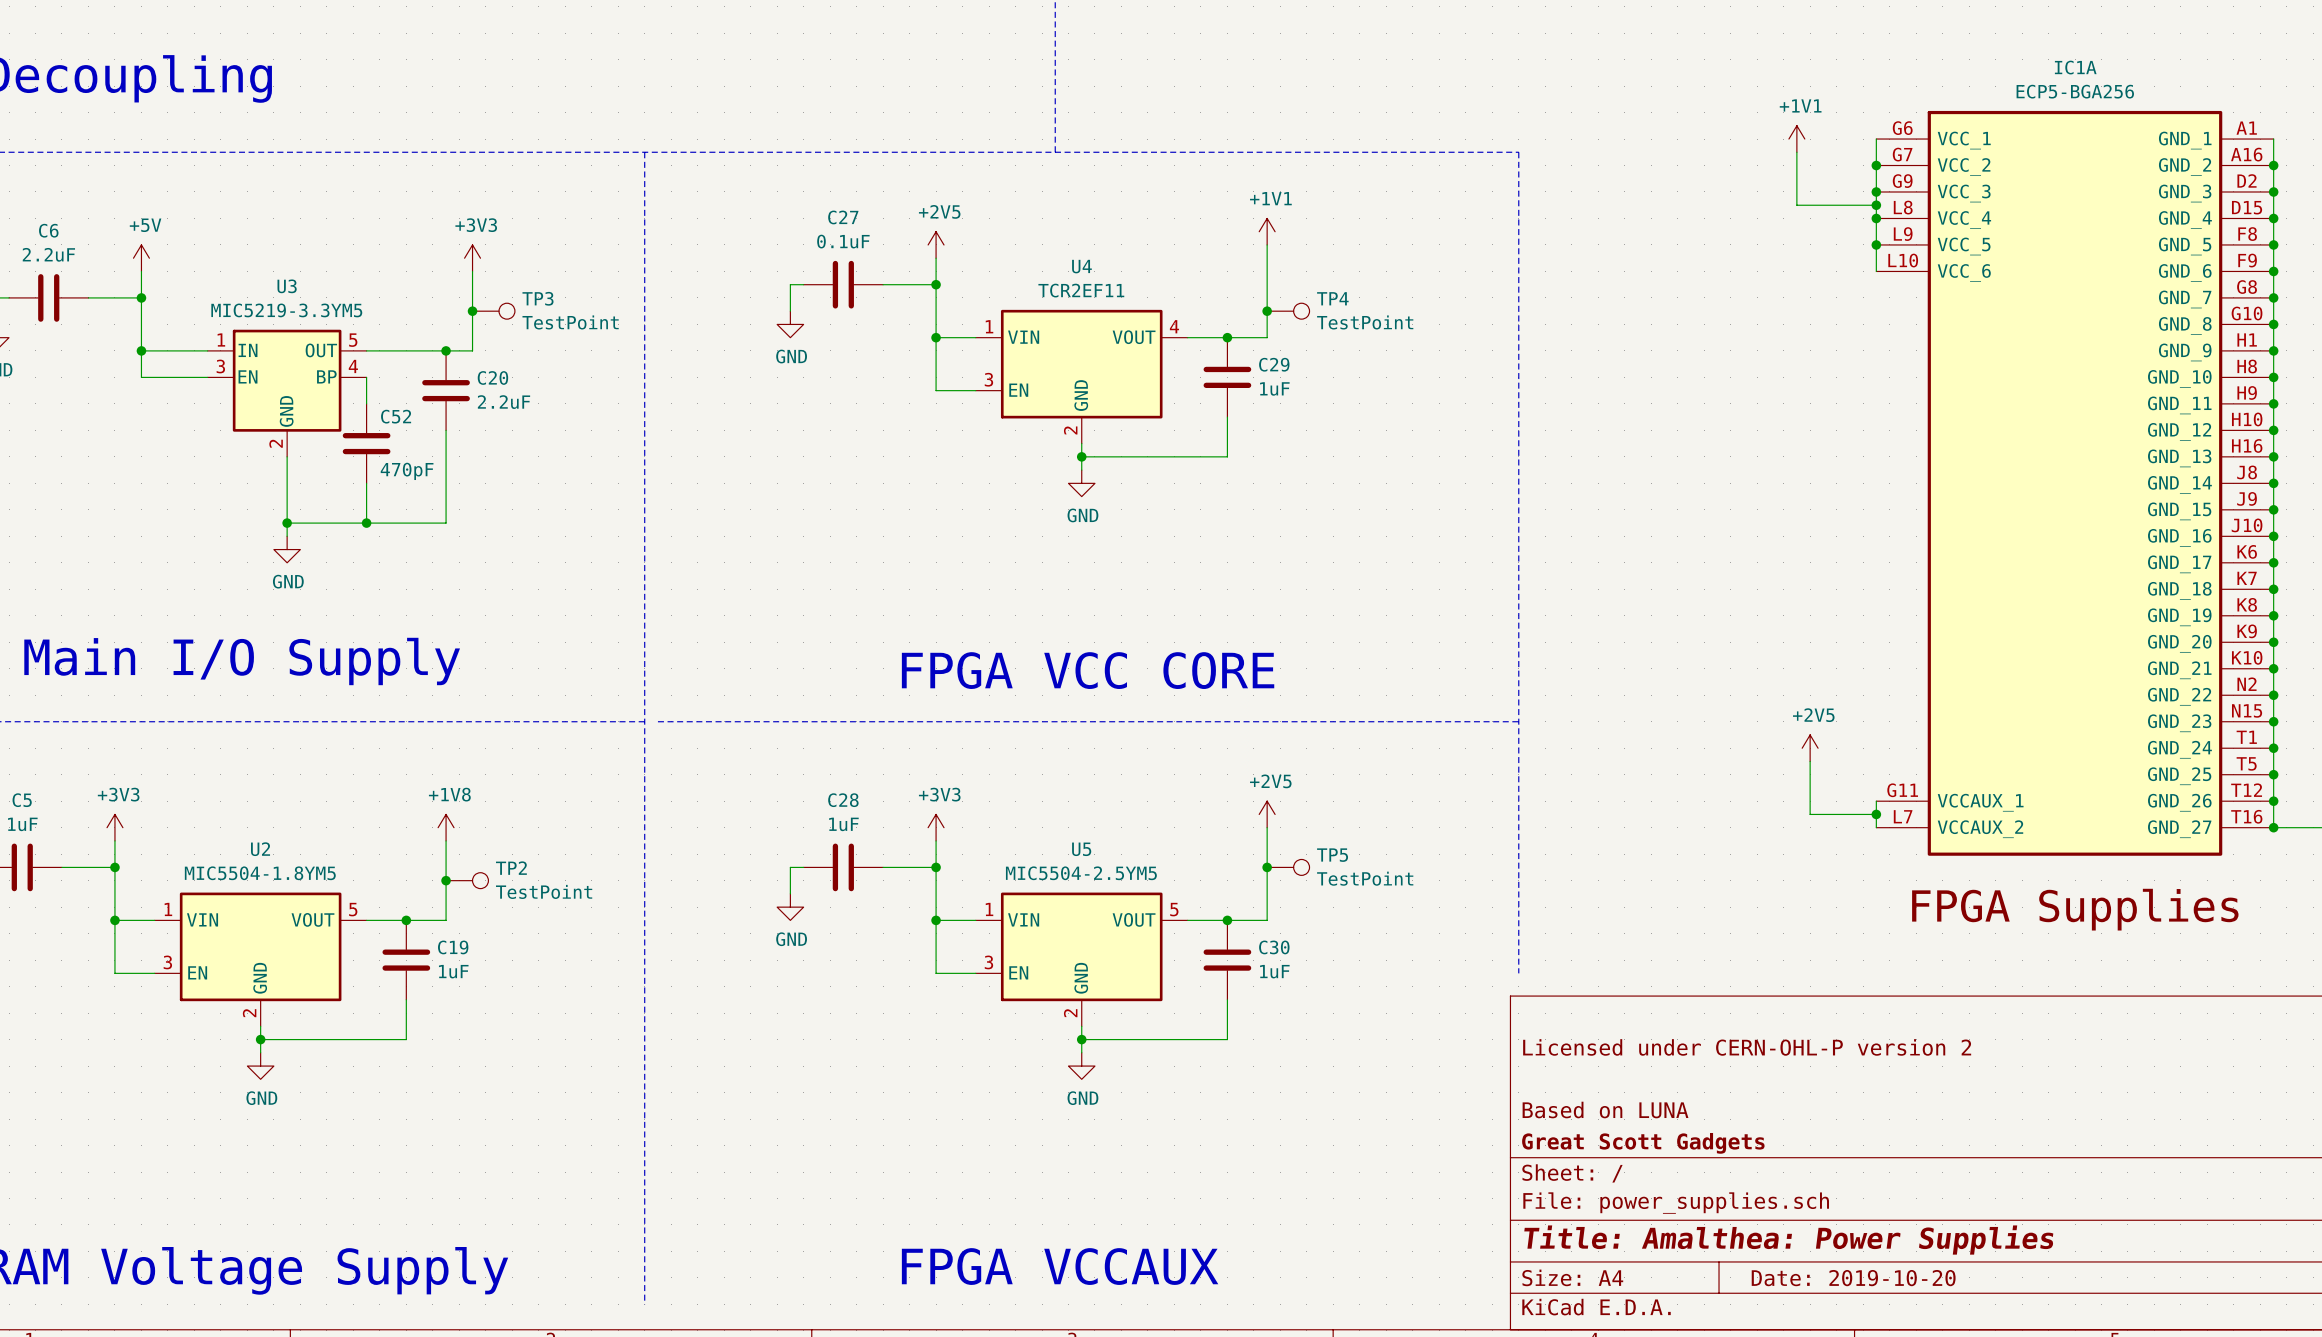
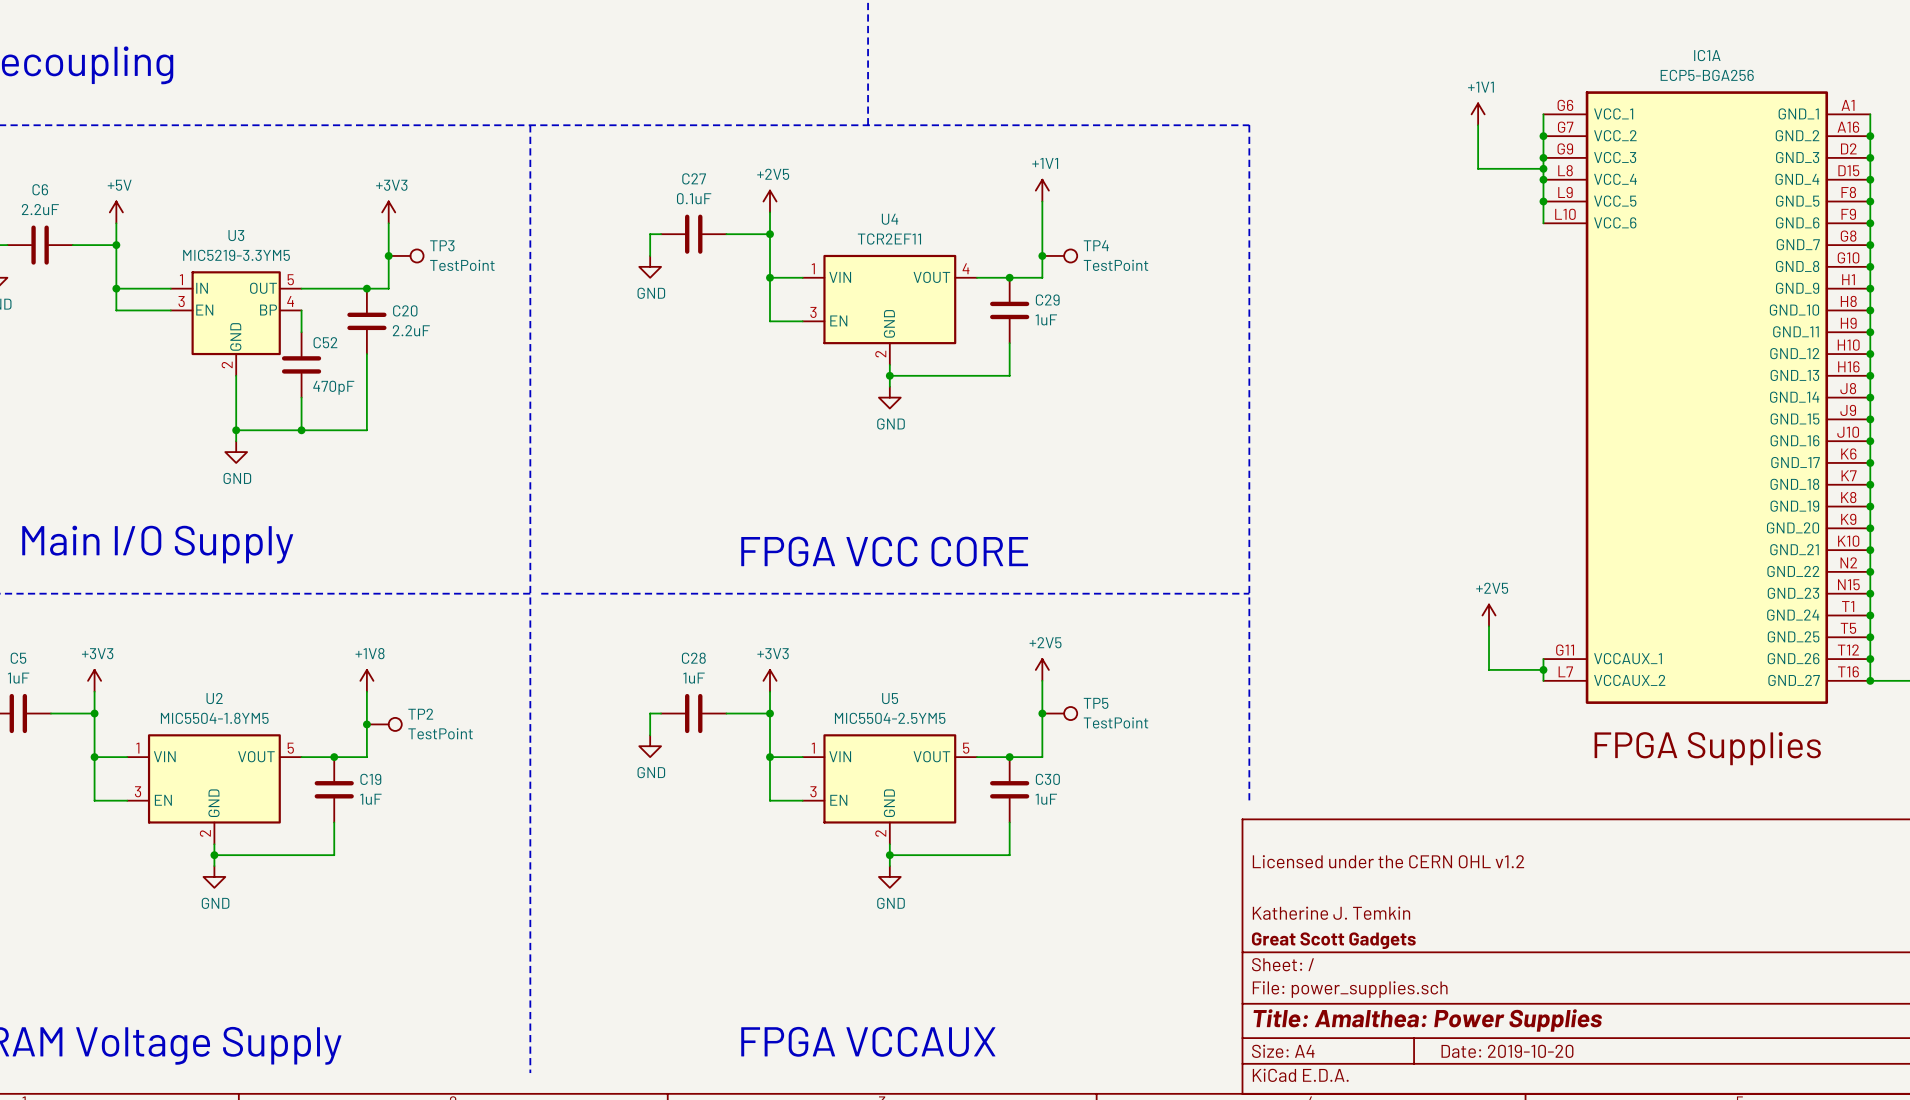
title block: Licensed under CERN-OHL-P version 2 (1747, 1047) -> Licensed under the CERN OHL v1.2 (1388, 861)
title block: Based on LUNA (1605, 1110) -> Katherine J. Temkin (1331, 913)

